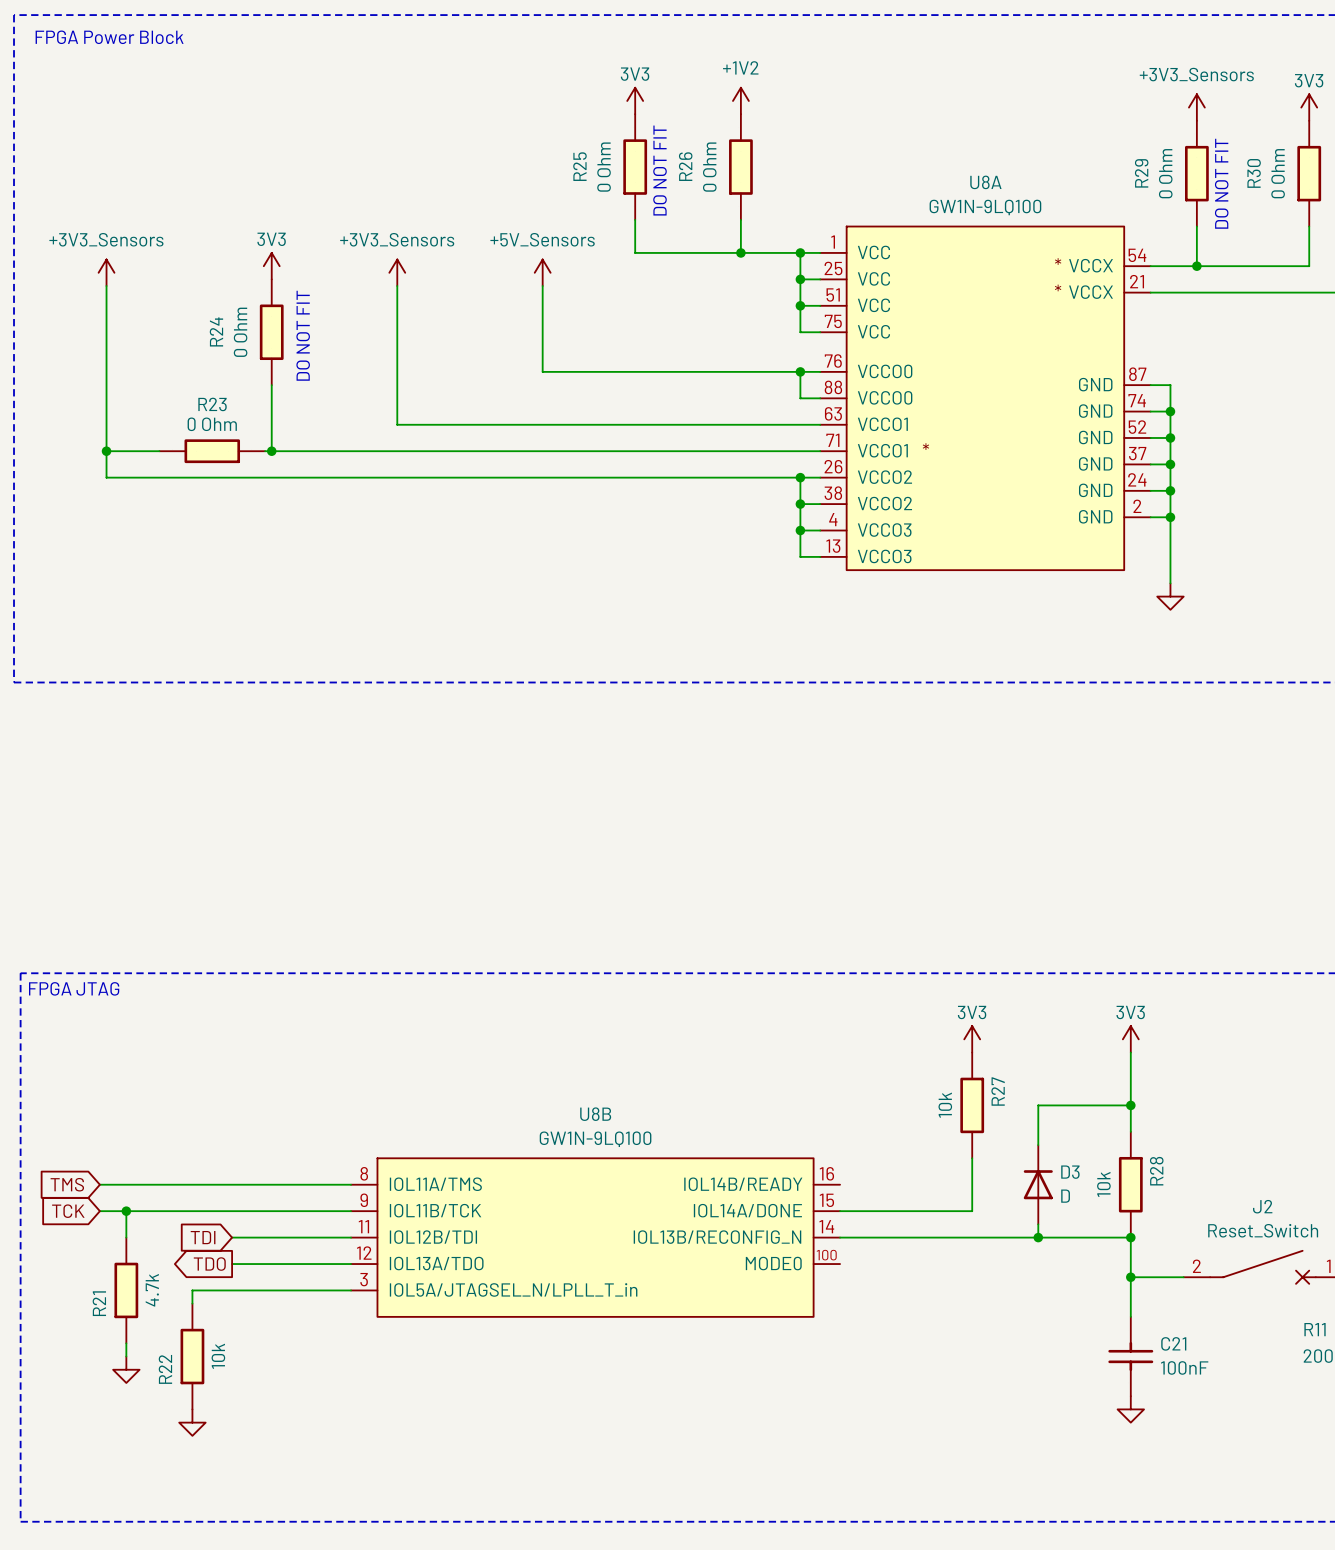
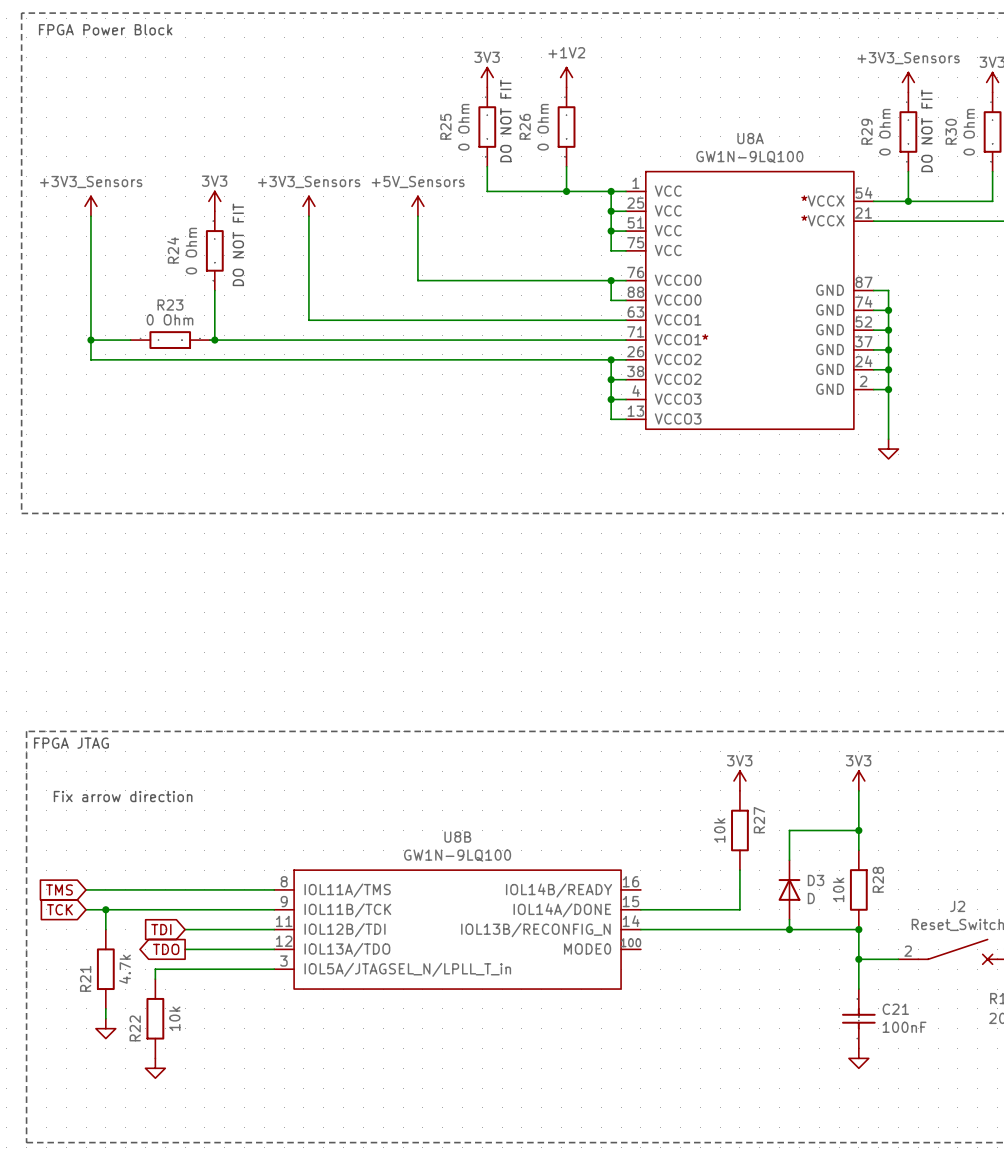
text: none -> Fix arrow direction (123, 796)

